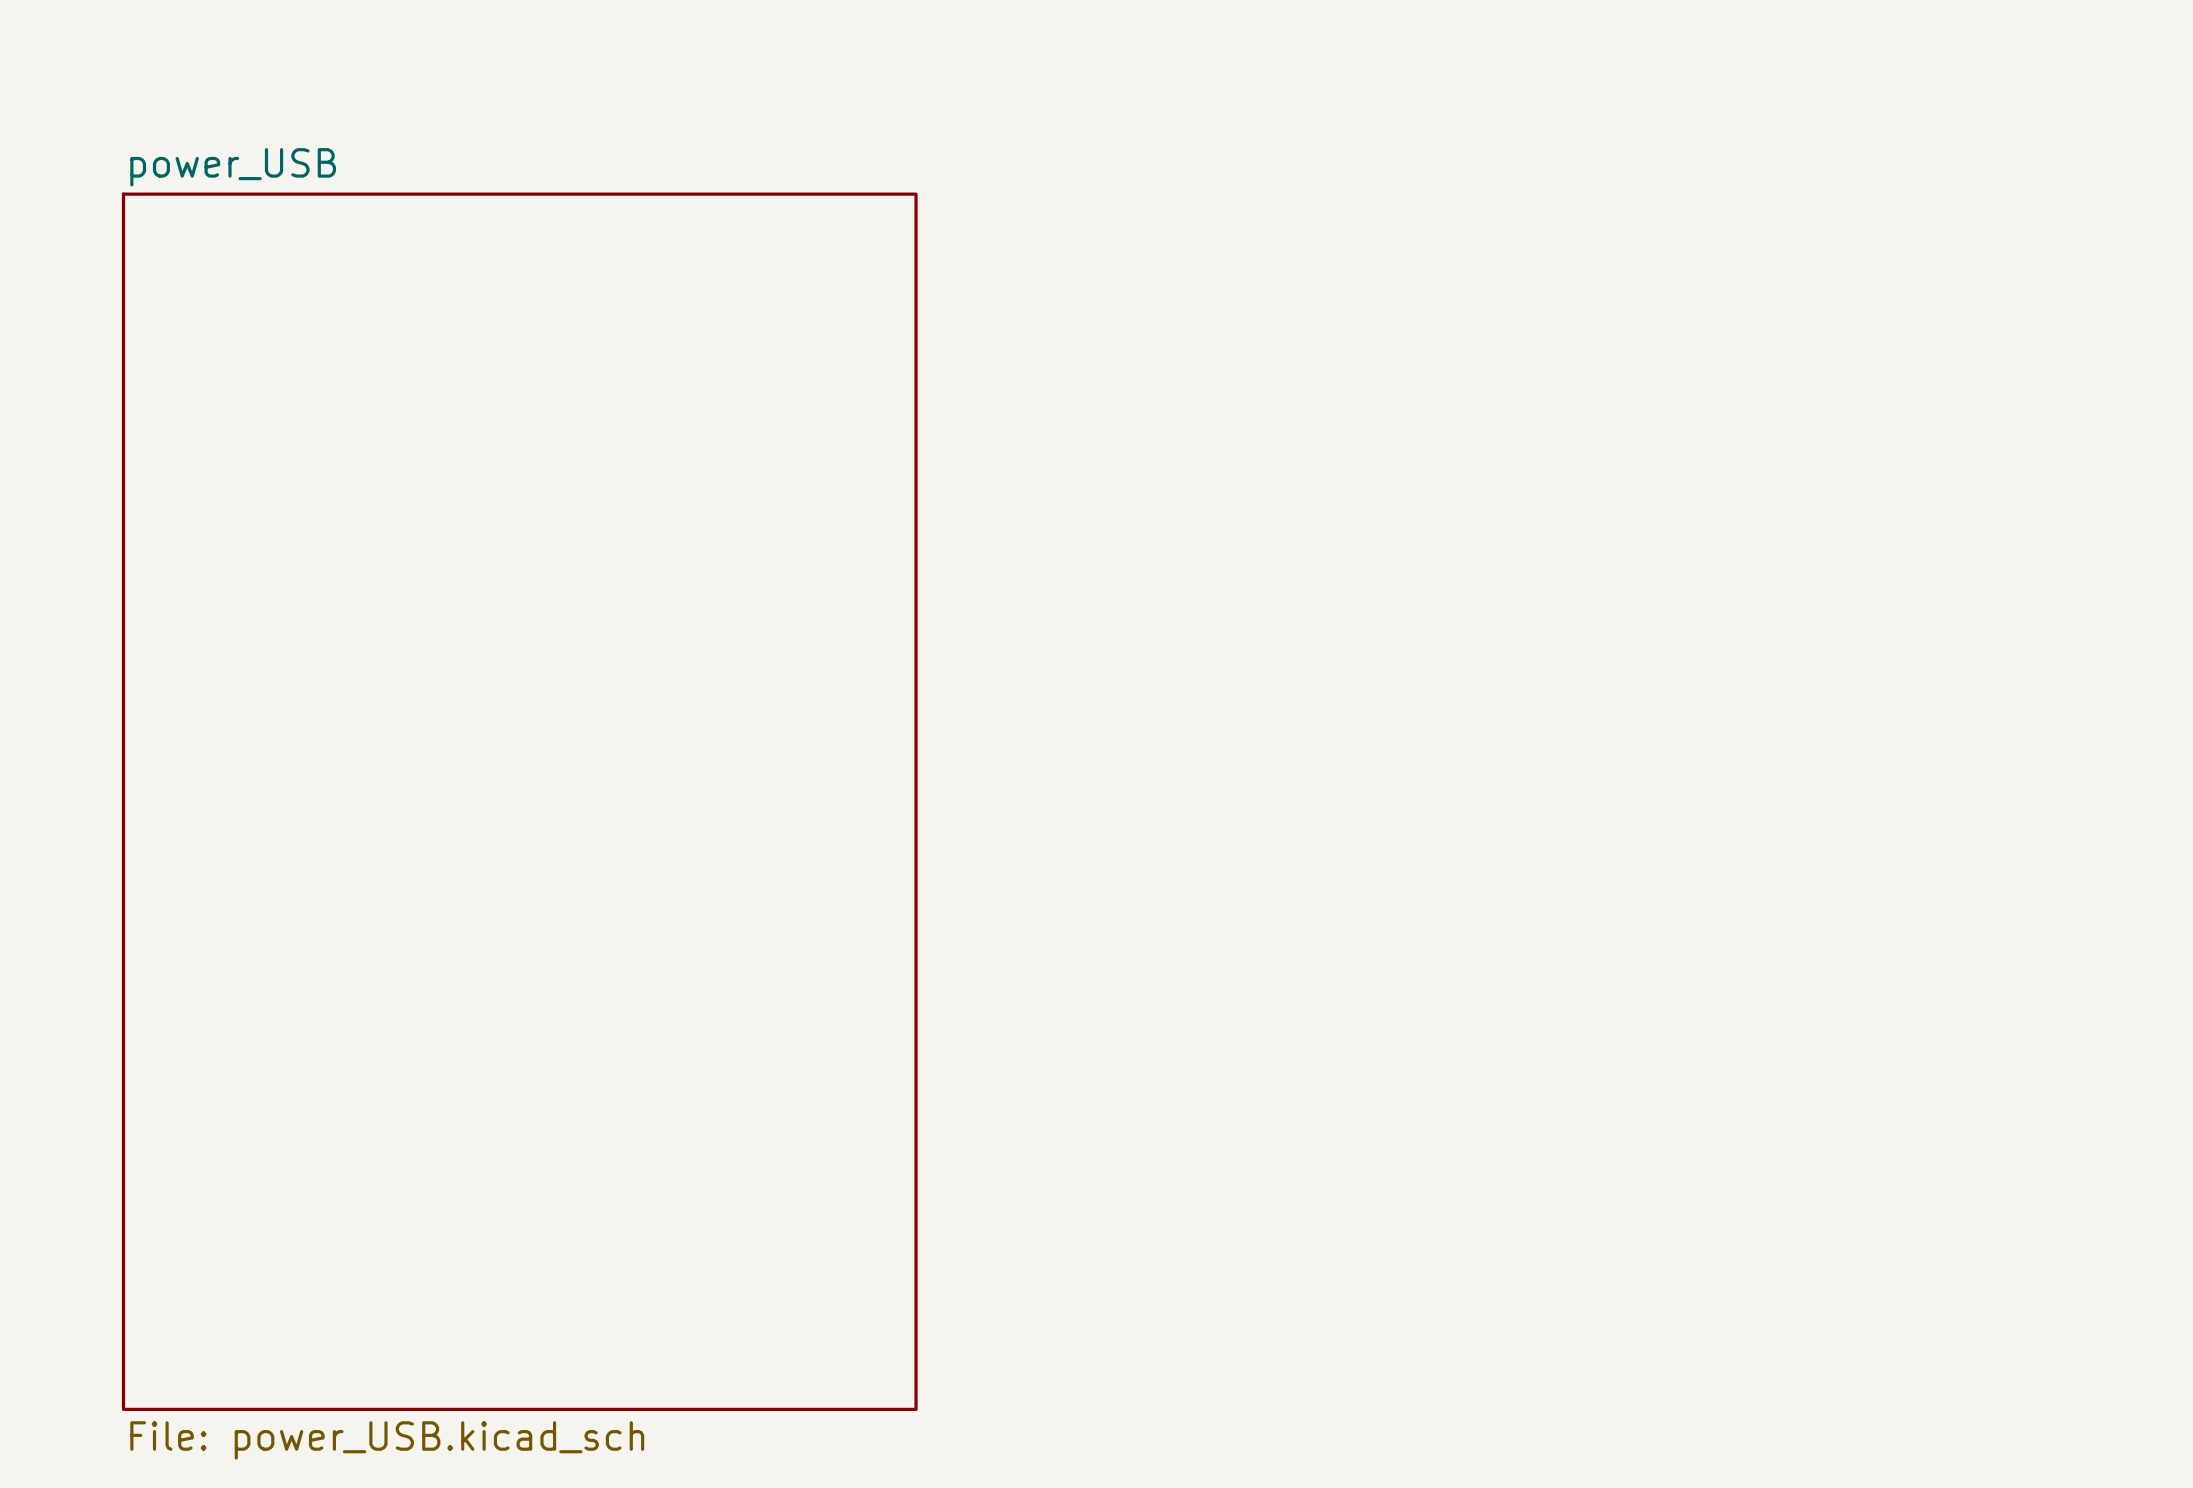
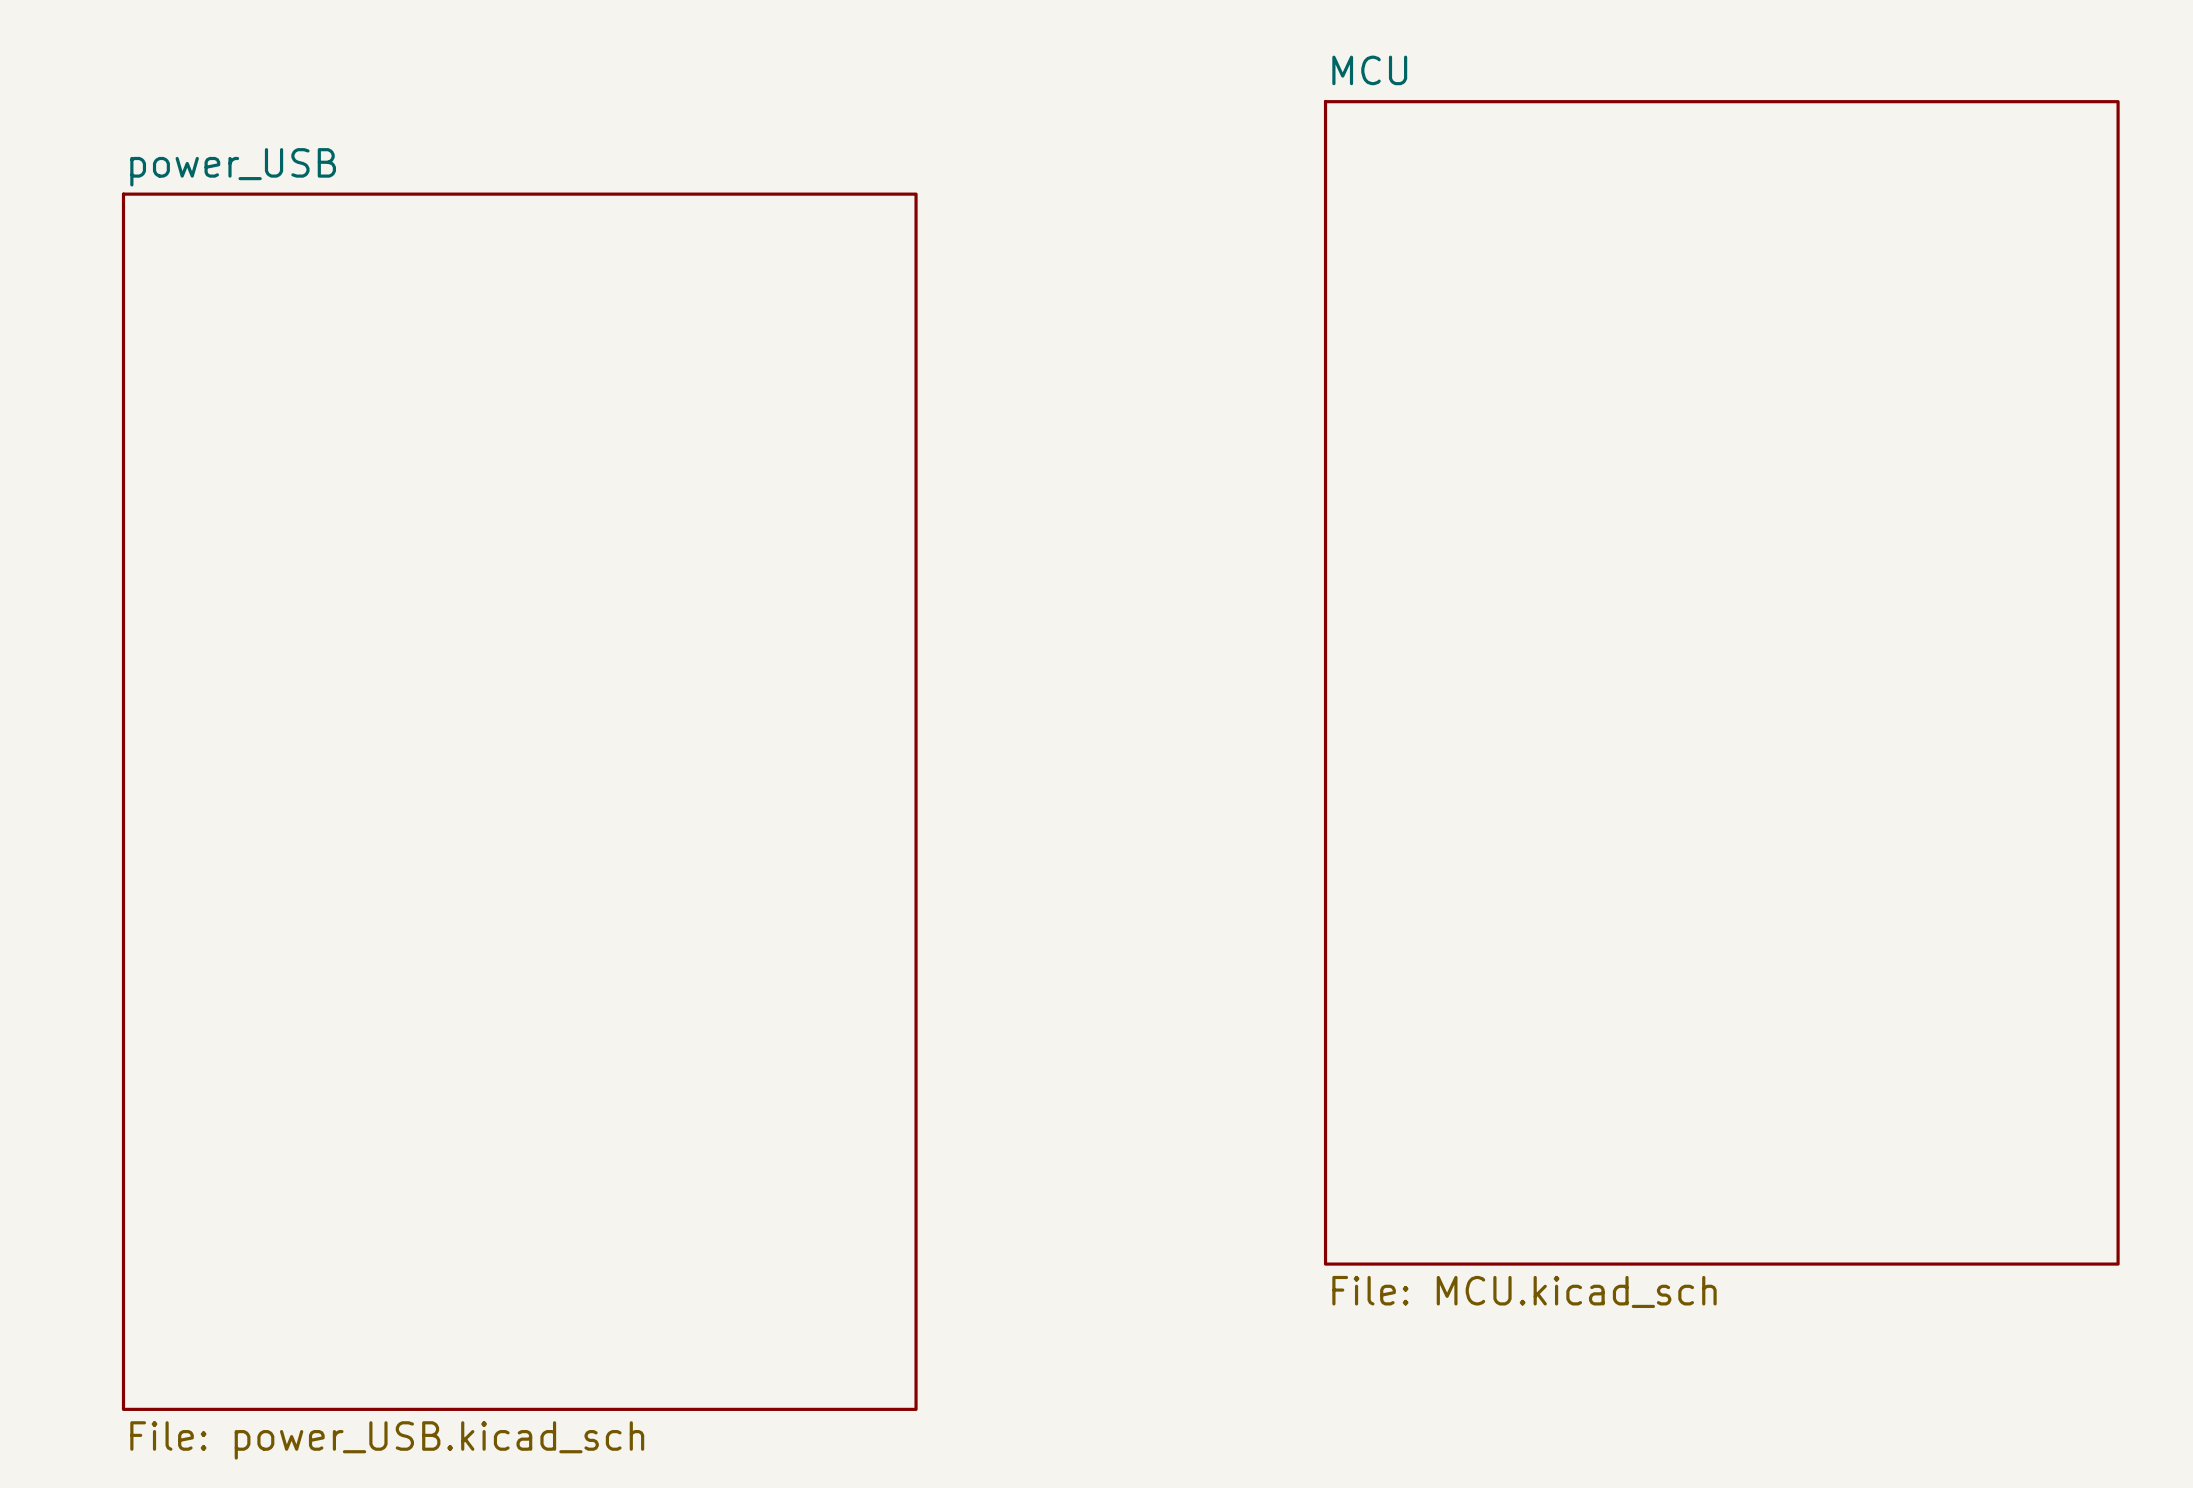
sheet MCU: none -> File: MCU.kicad_sch (1721, 682)

